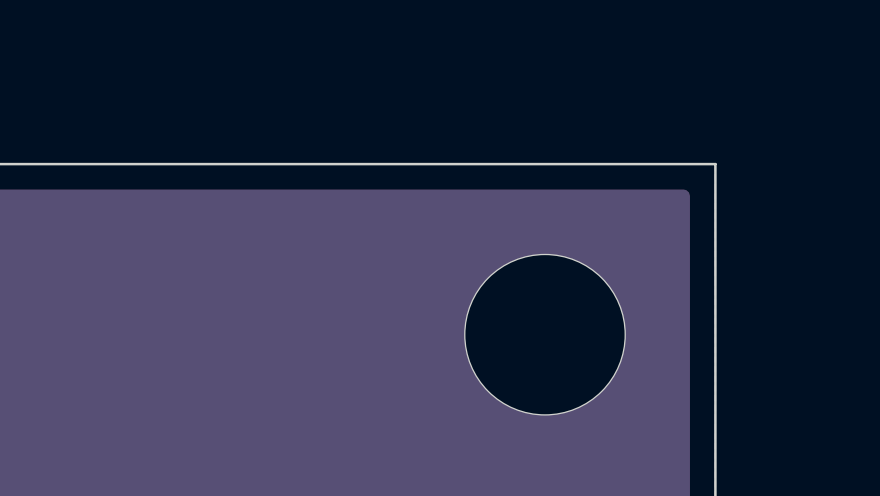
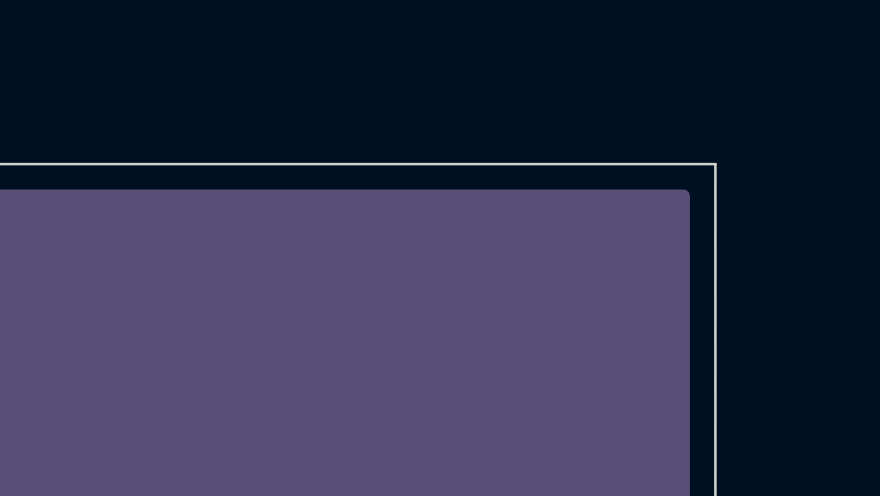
part: (545, 334) -> none

